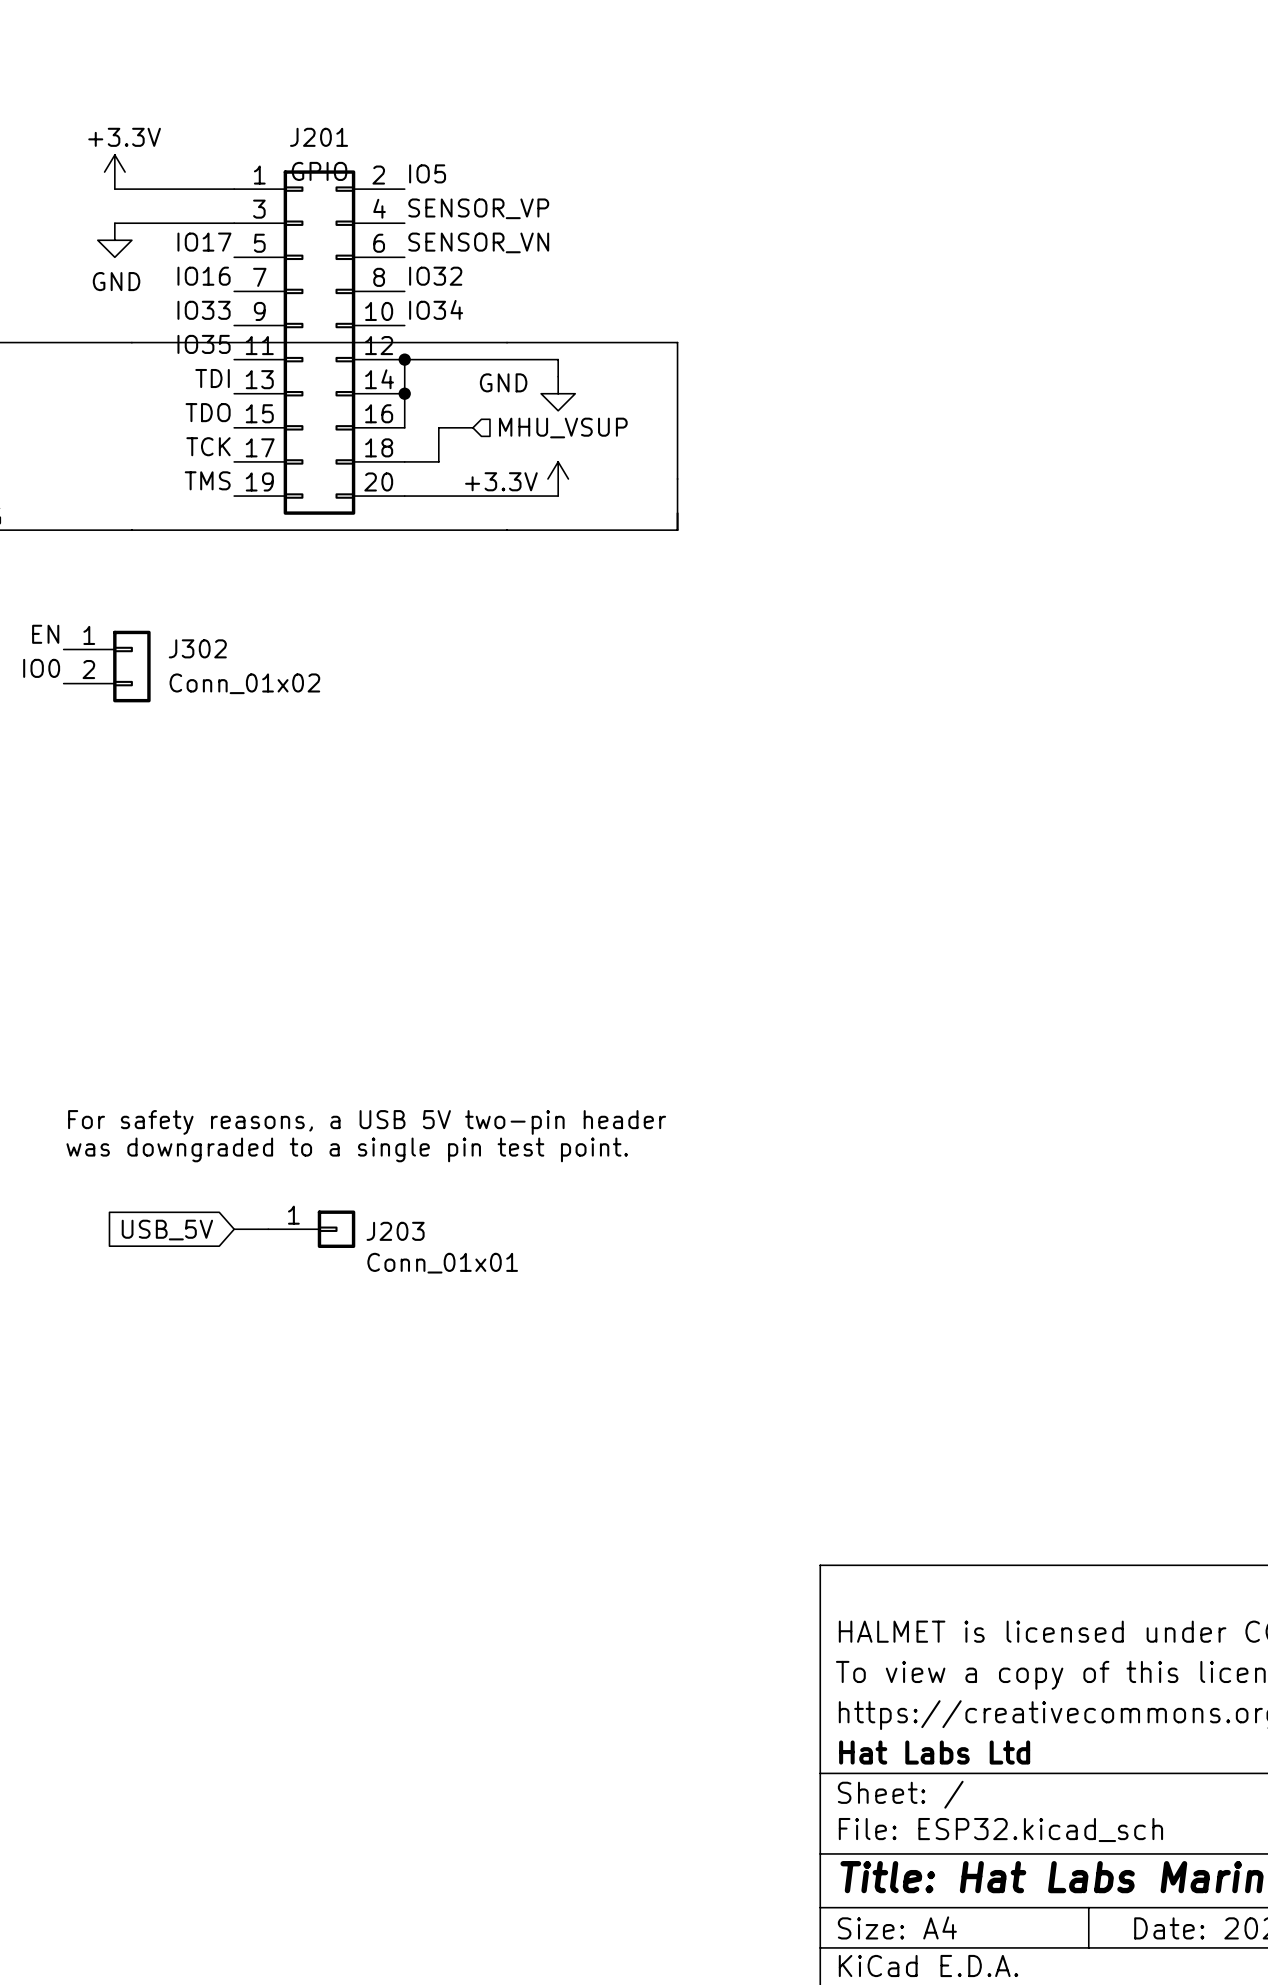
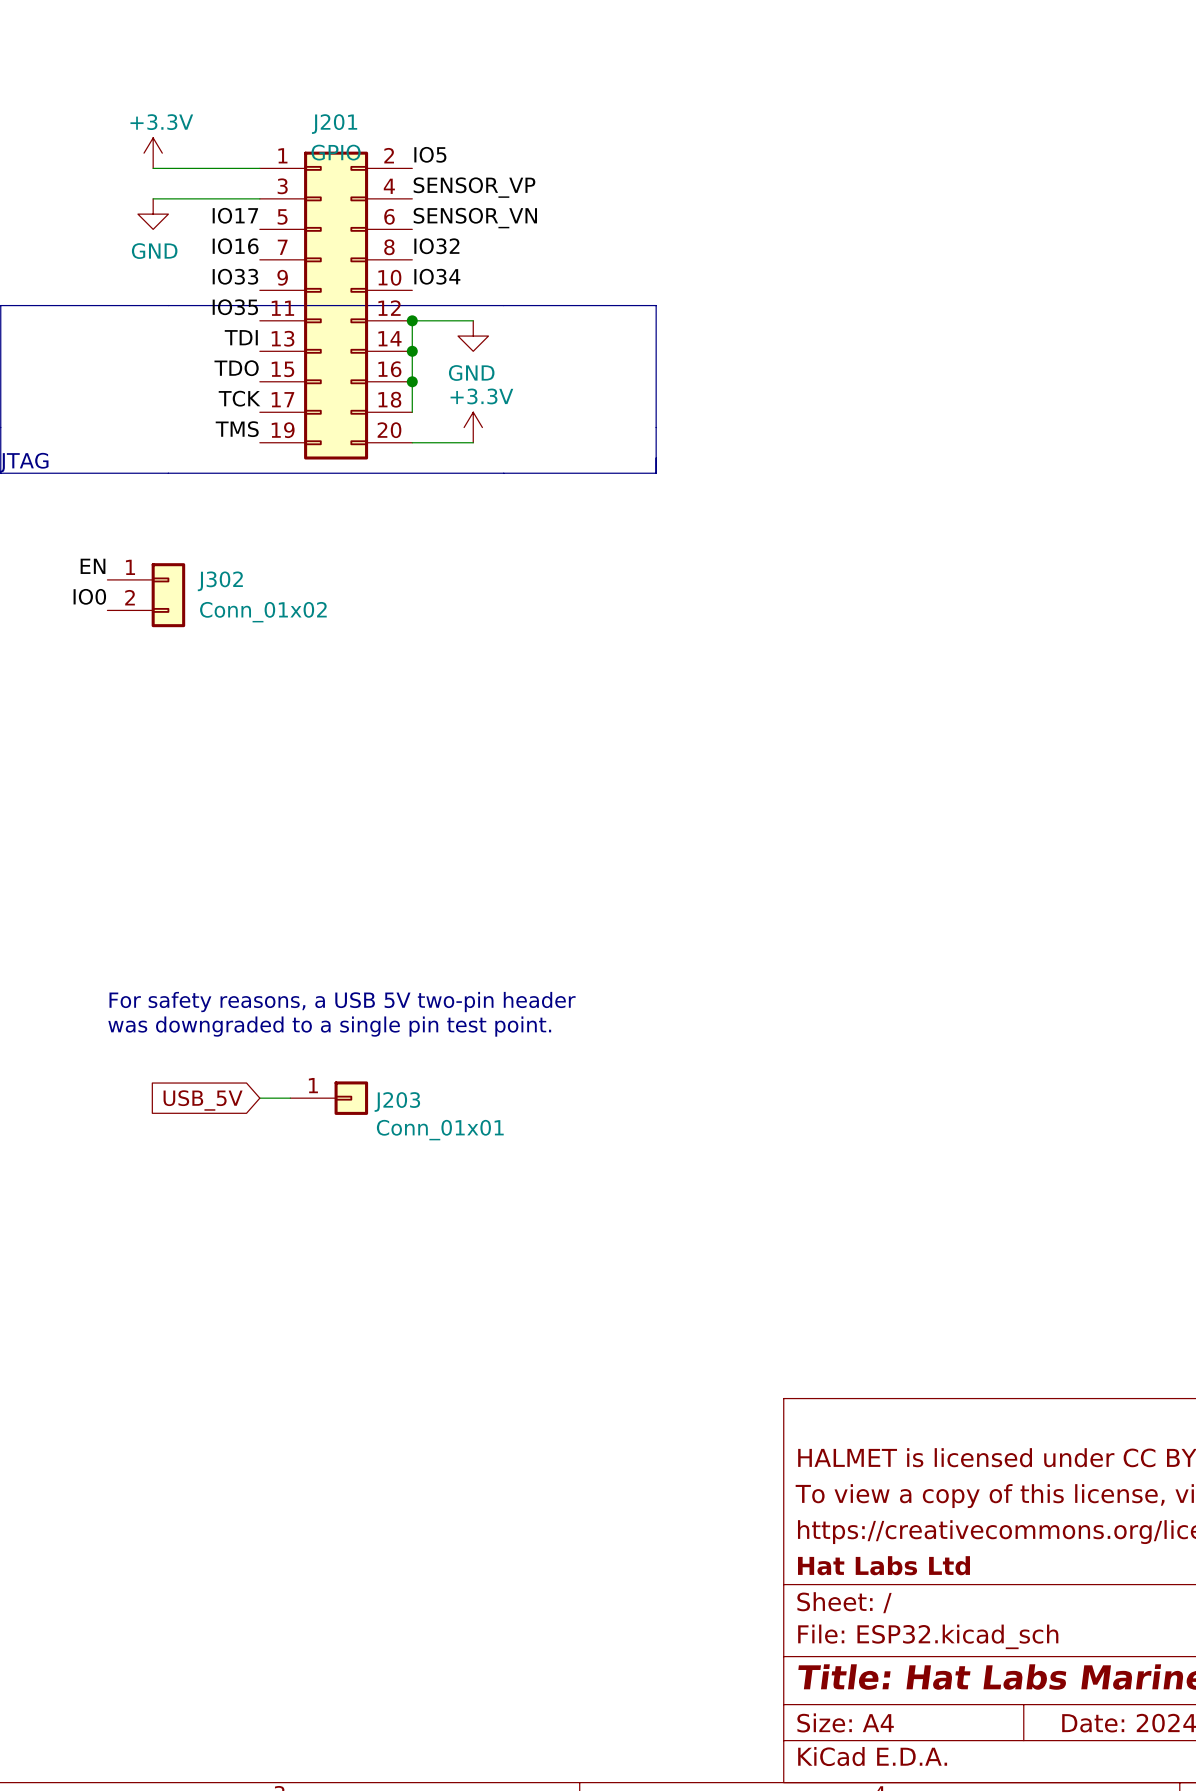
wire: (472, 359) (558, 359) (558, 376) -> none
power symbol text position: GND (503, 382) -> GND (471, 372)
power symbol position: GND (558, 393) -> GND (473, 336)
junction: none -> (412, 381)
wire: (472, 427) (438, 427) (438, 461) (404, 461) -> (412, 381) (412, 412)
hierarchical label: MHU_VSUP (563, 428) -> none
power symbol position: +3.3V (558, 478) -> +3.3V (473, 427)
power symbol text position: +3.3V (501, 481) -> +3.3V (481, 396)
wire: (472, 496) (558, 496) -> none

